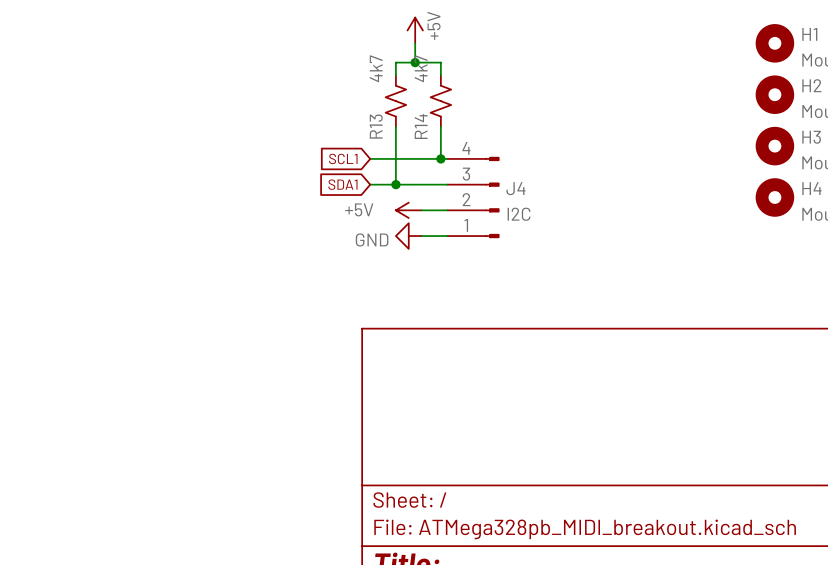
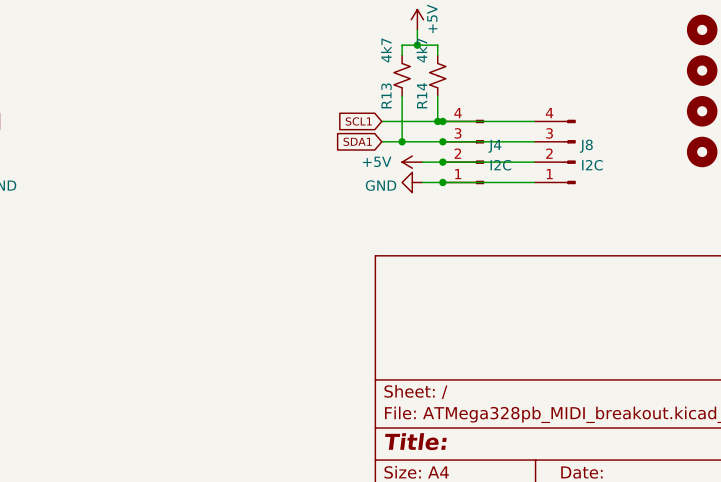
wire: none -> (442, 121) (534, 121)
junction: none -> (442, 121)
wire: none -> (442, 141) (534, 141)
junction: none -> (442, 141)
J8: none -> I2C (555, 151)
wire: none -> (442, 162) (534, 162)
junction: none -> (442, 162)
wire: none -> (442, 182) (534, 182)
junction: none -> (442, 182)

